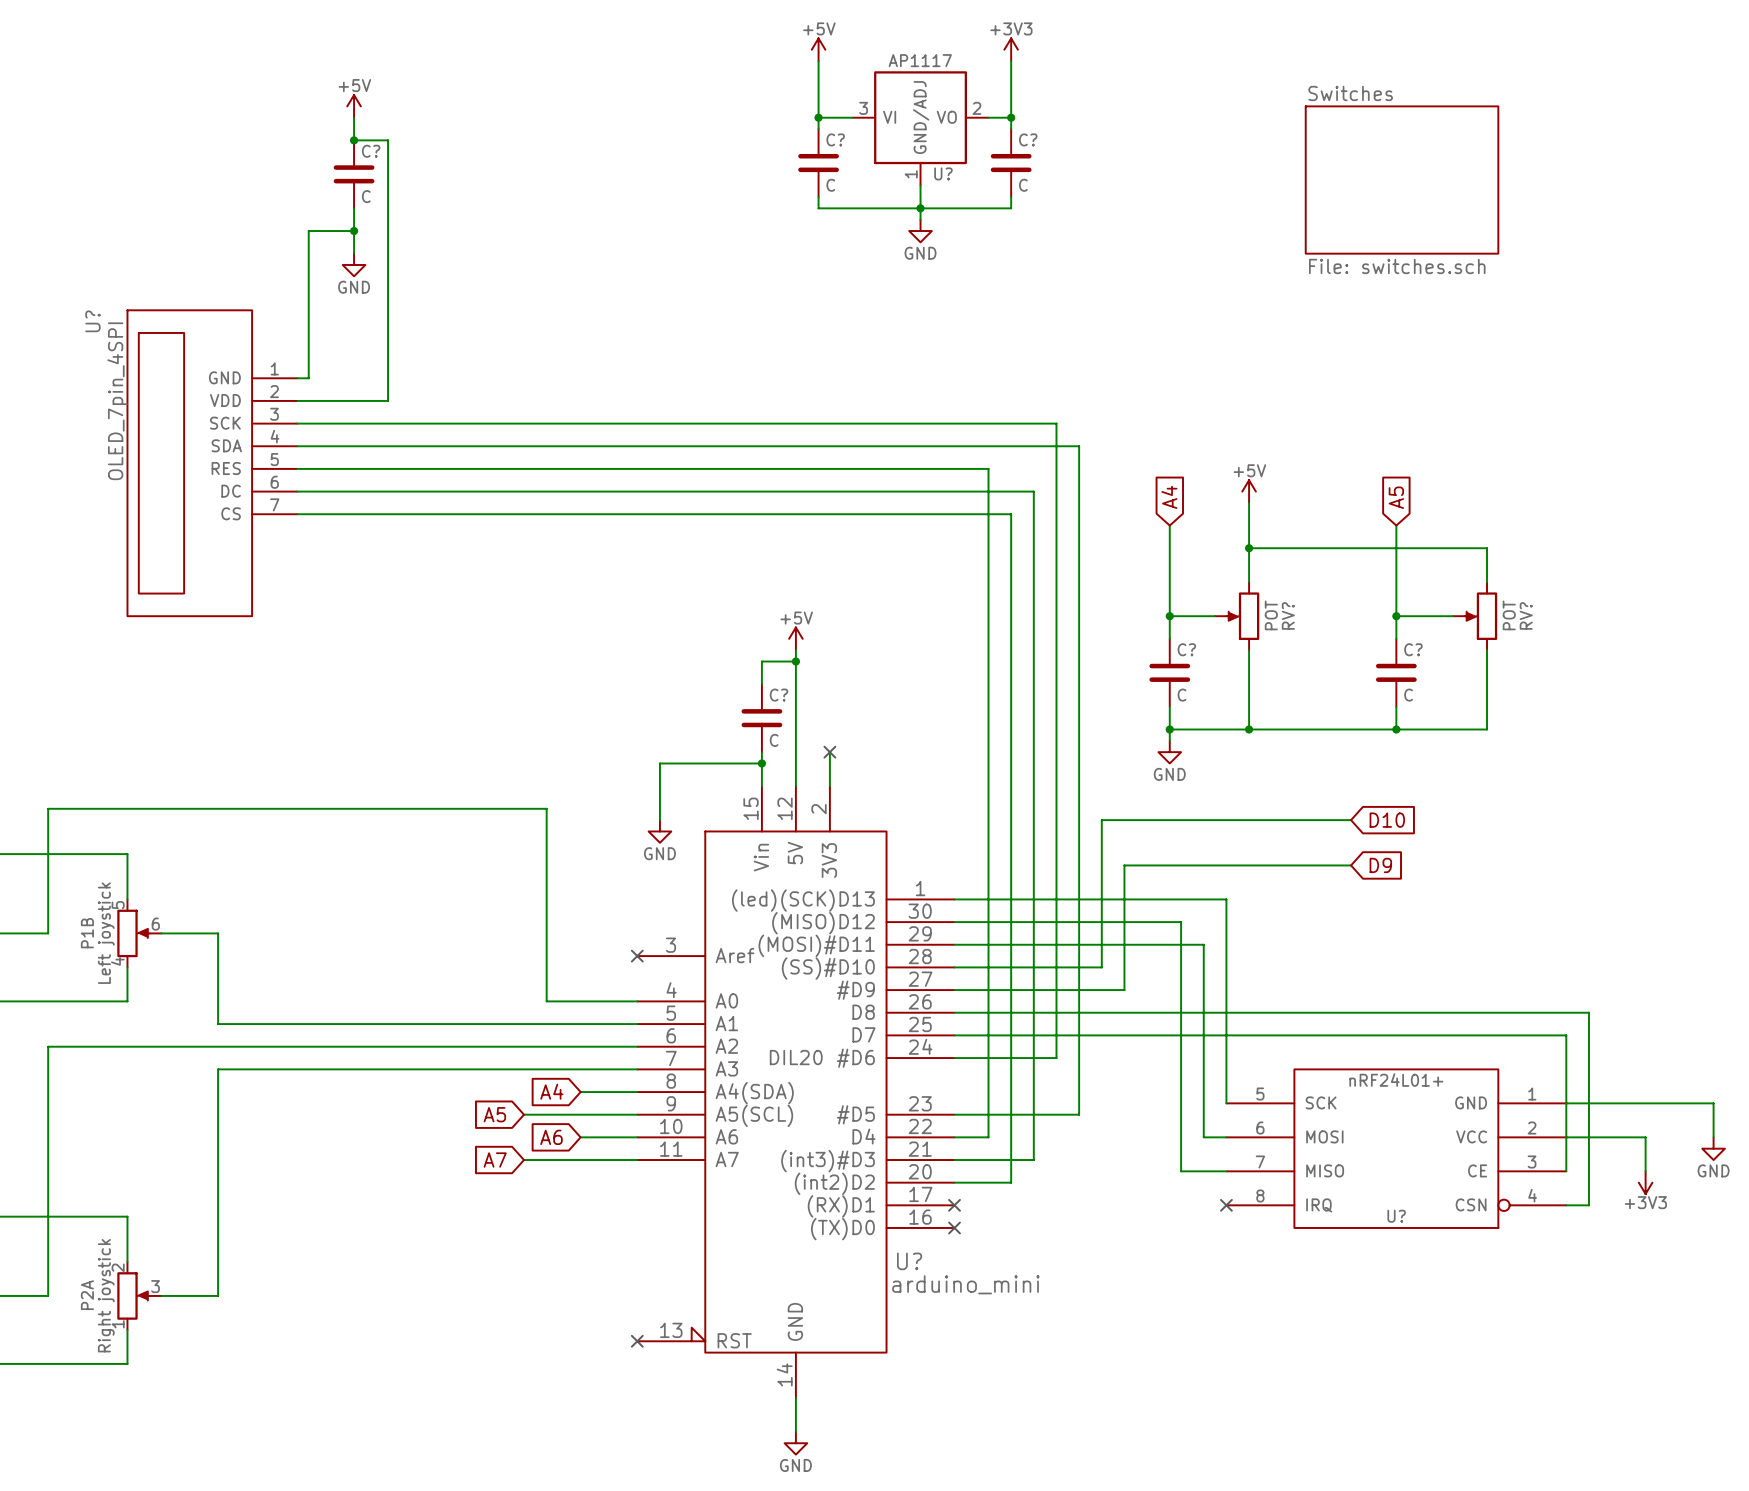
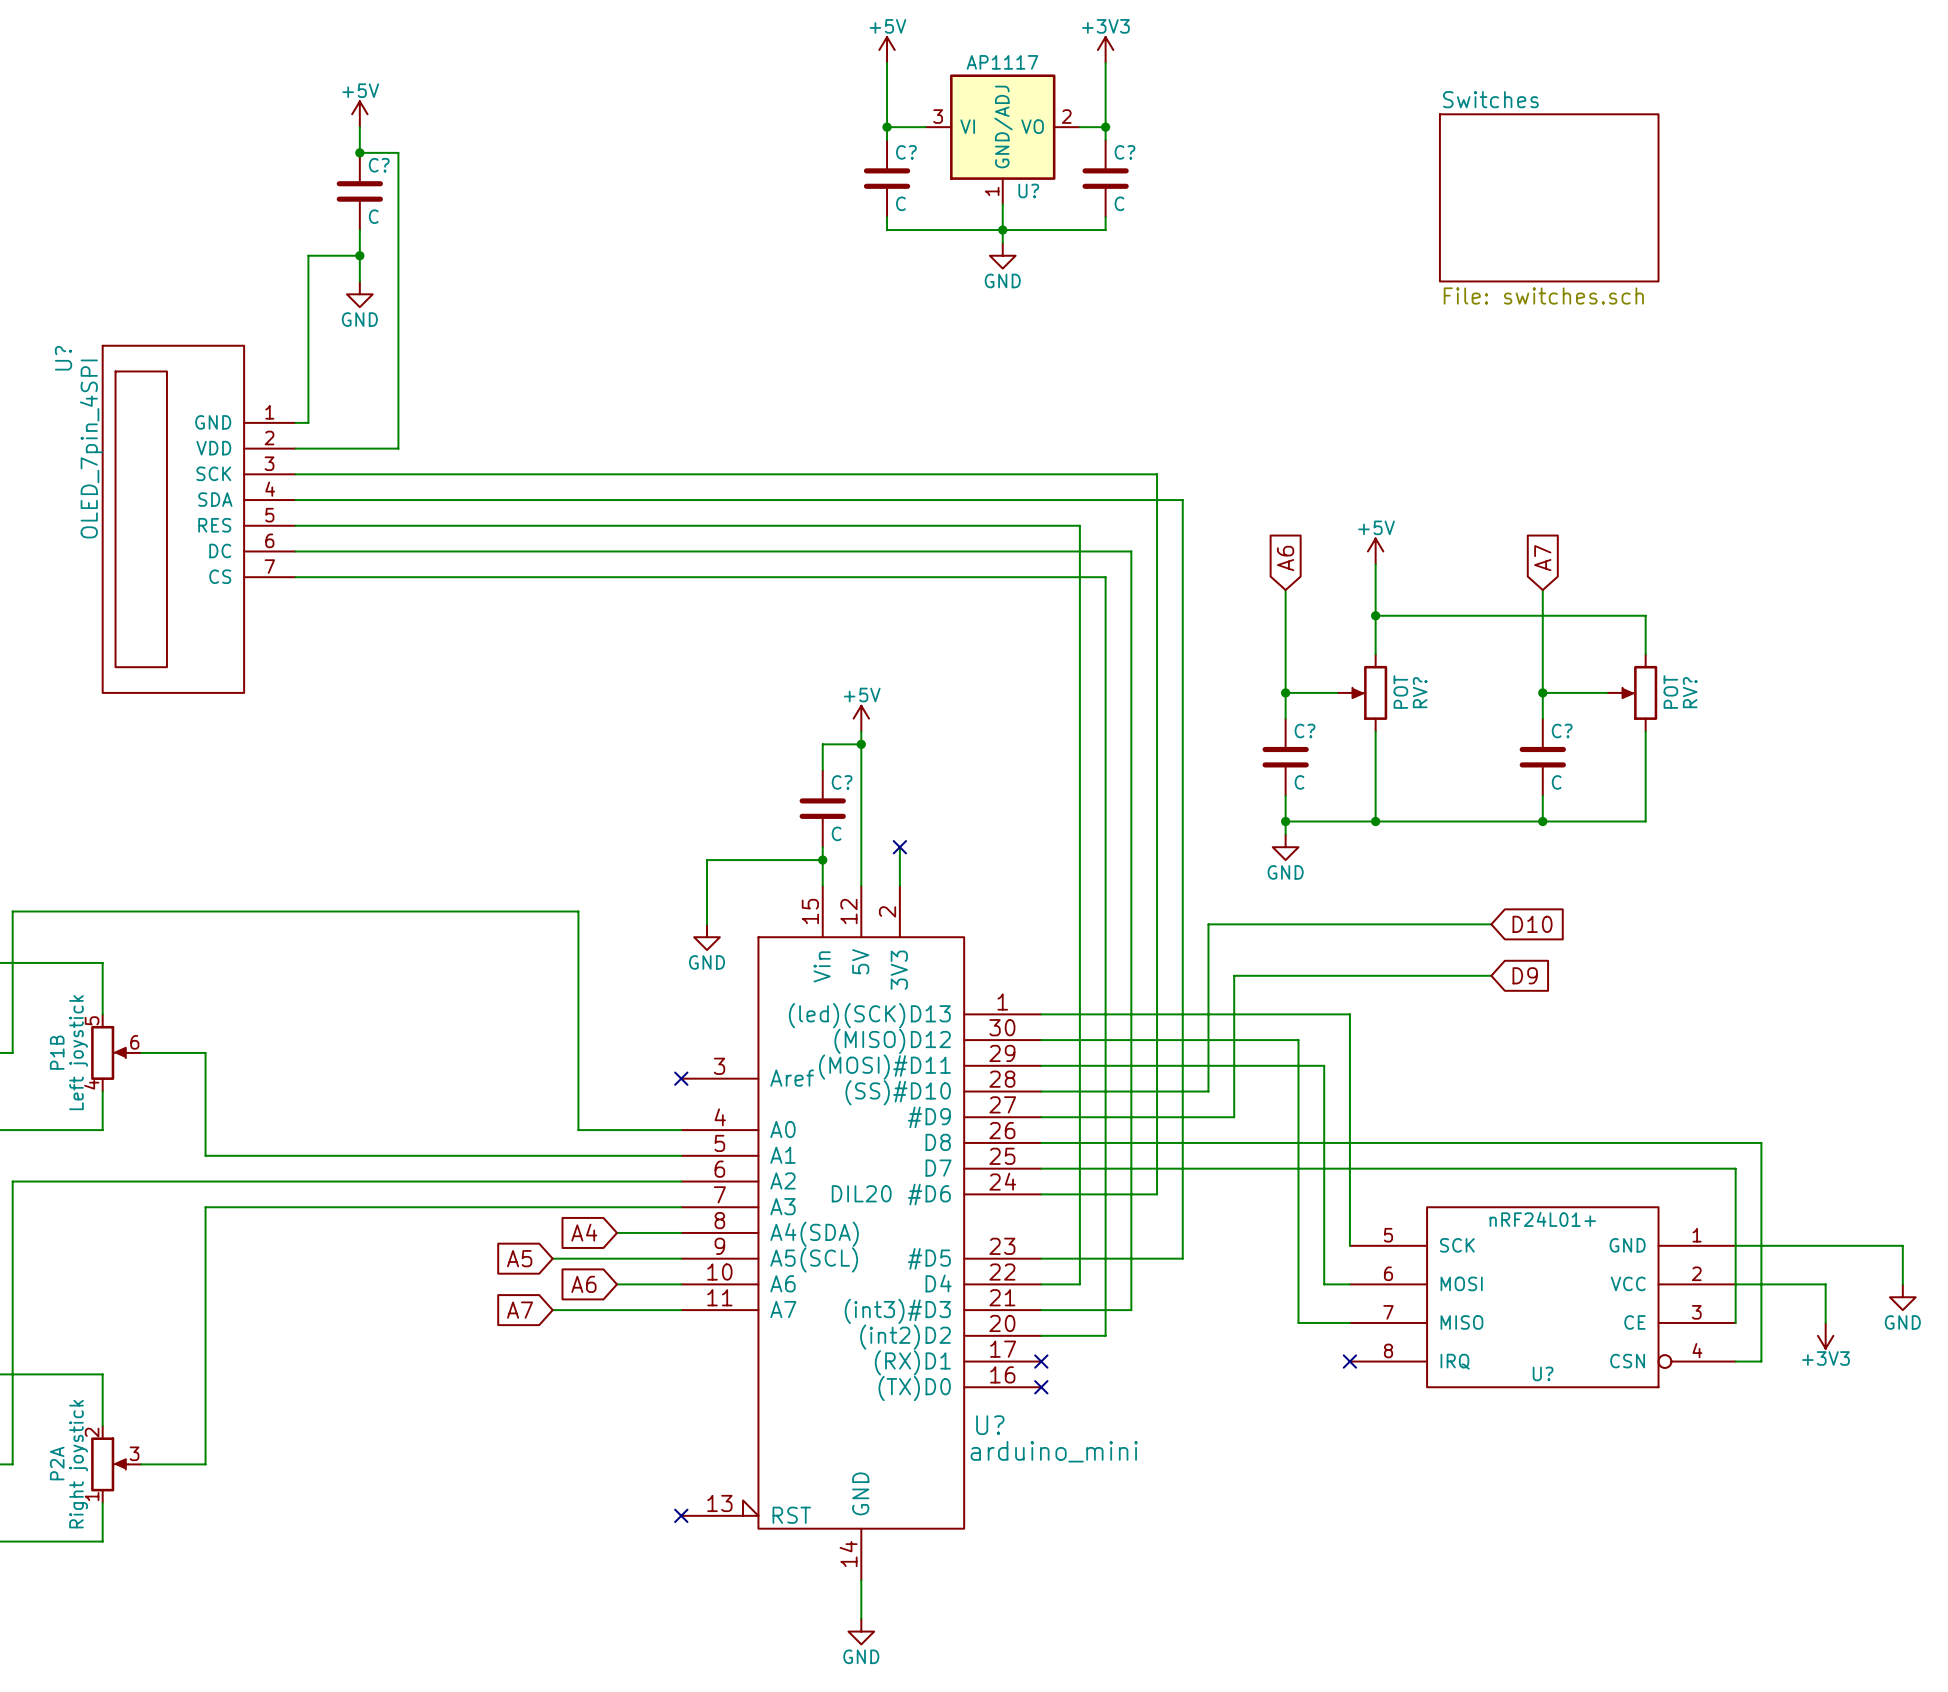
global label: A4 (1169, 497) -> A6 (1285, 558)
global label: A5 (1396, 497) -> A7 (1542, 558)

